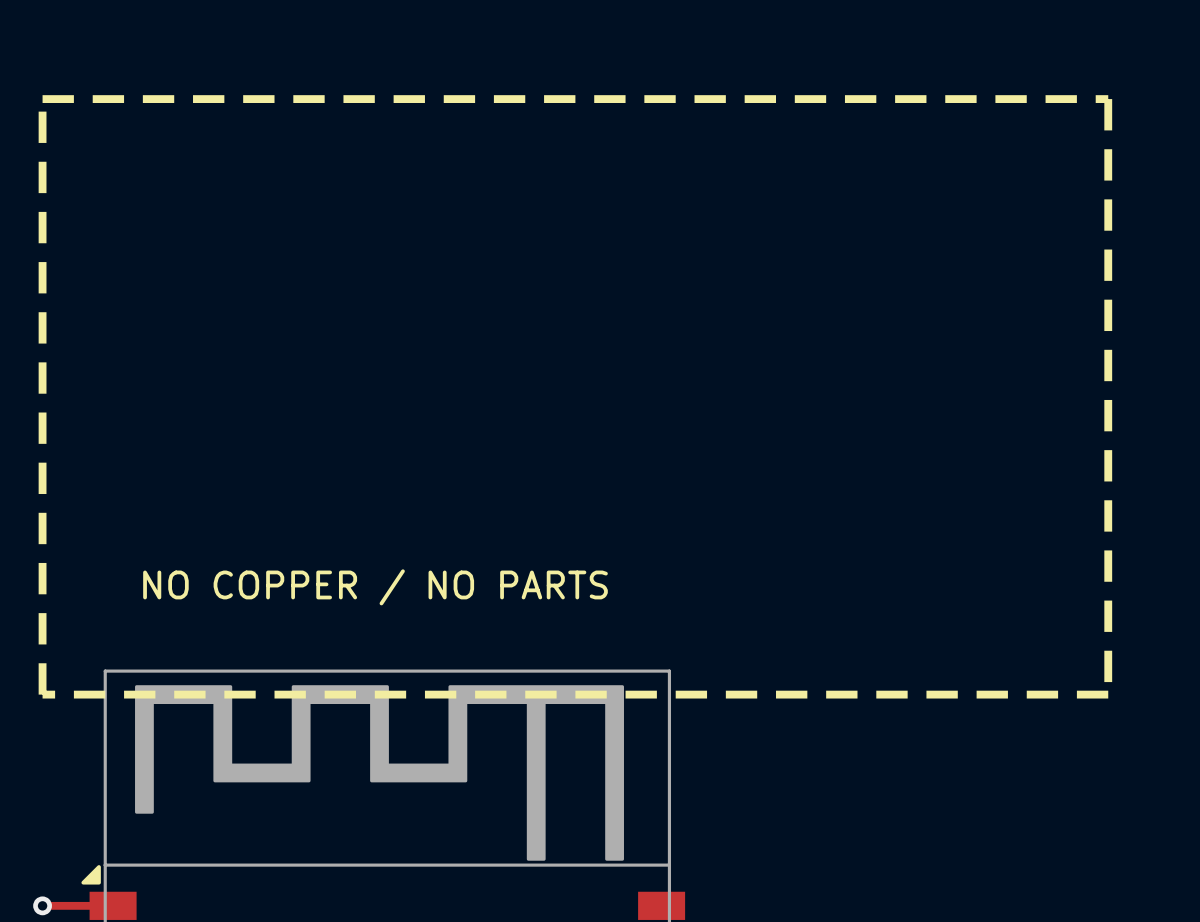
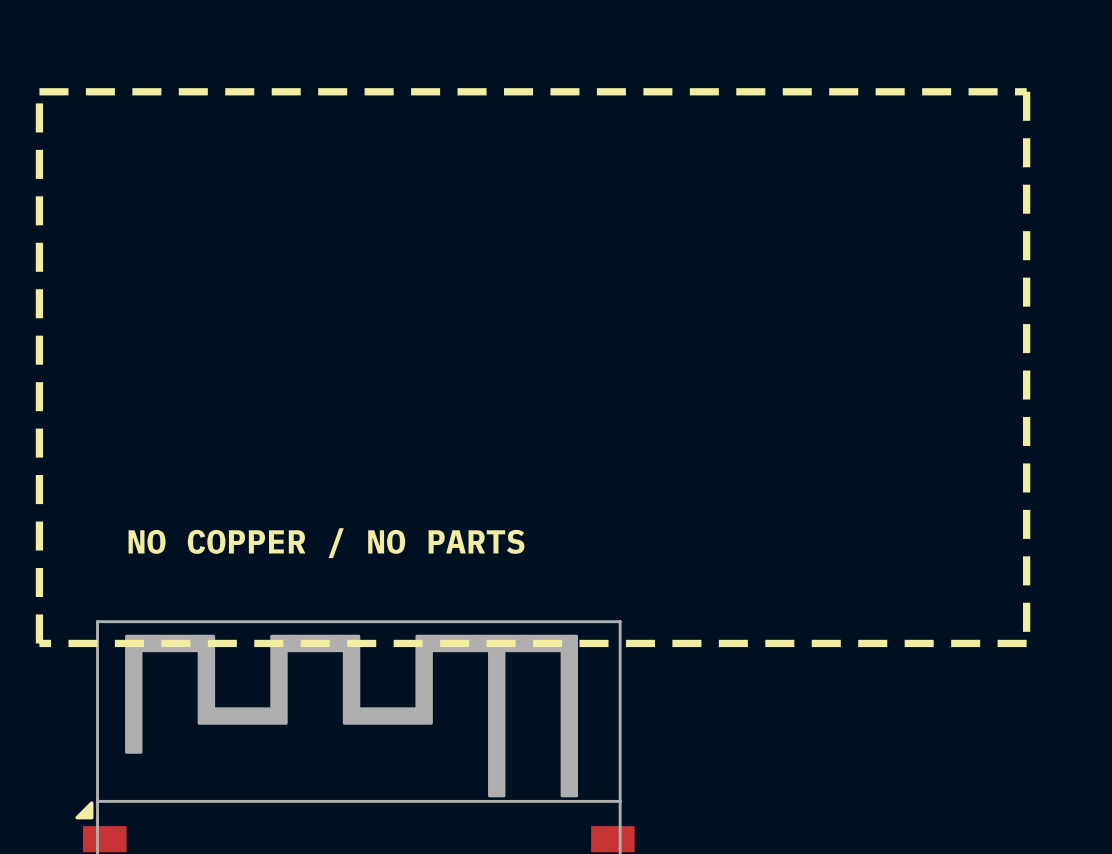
track: (42, 905) (113, 905) -> none
via: (42, 905) -> none

